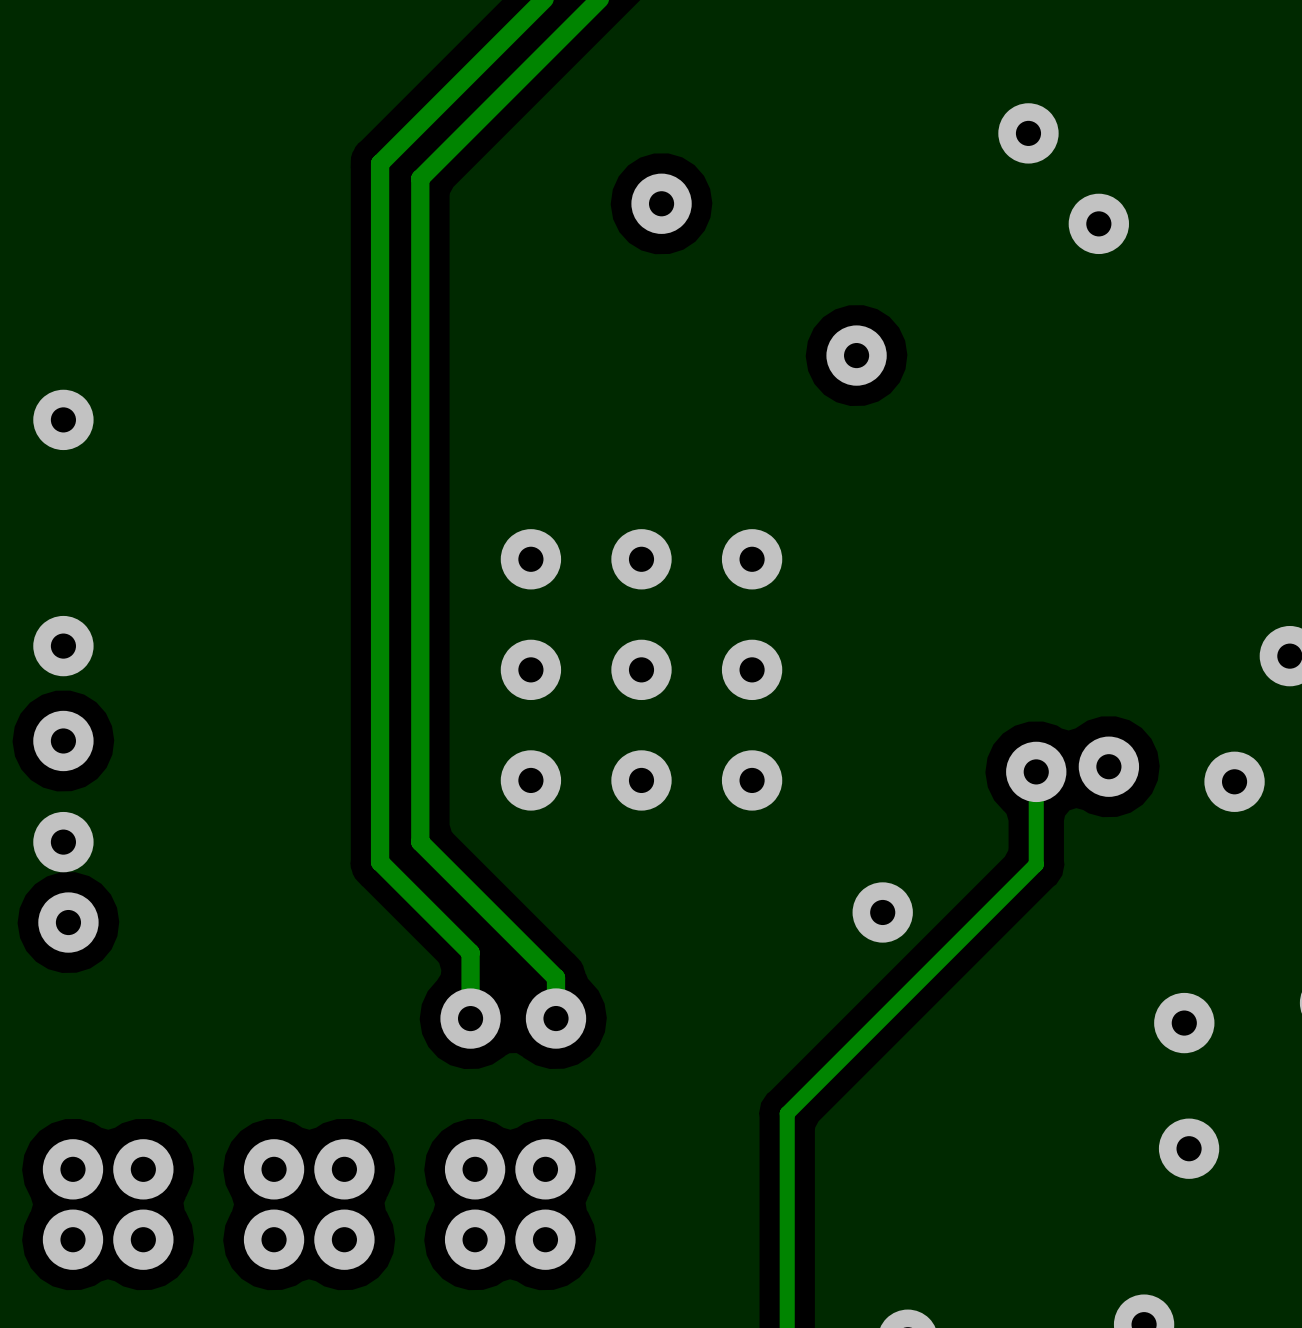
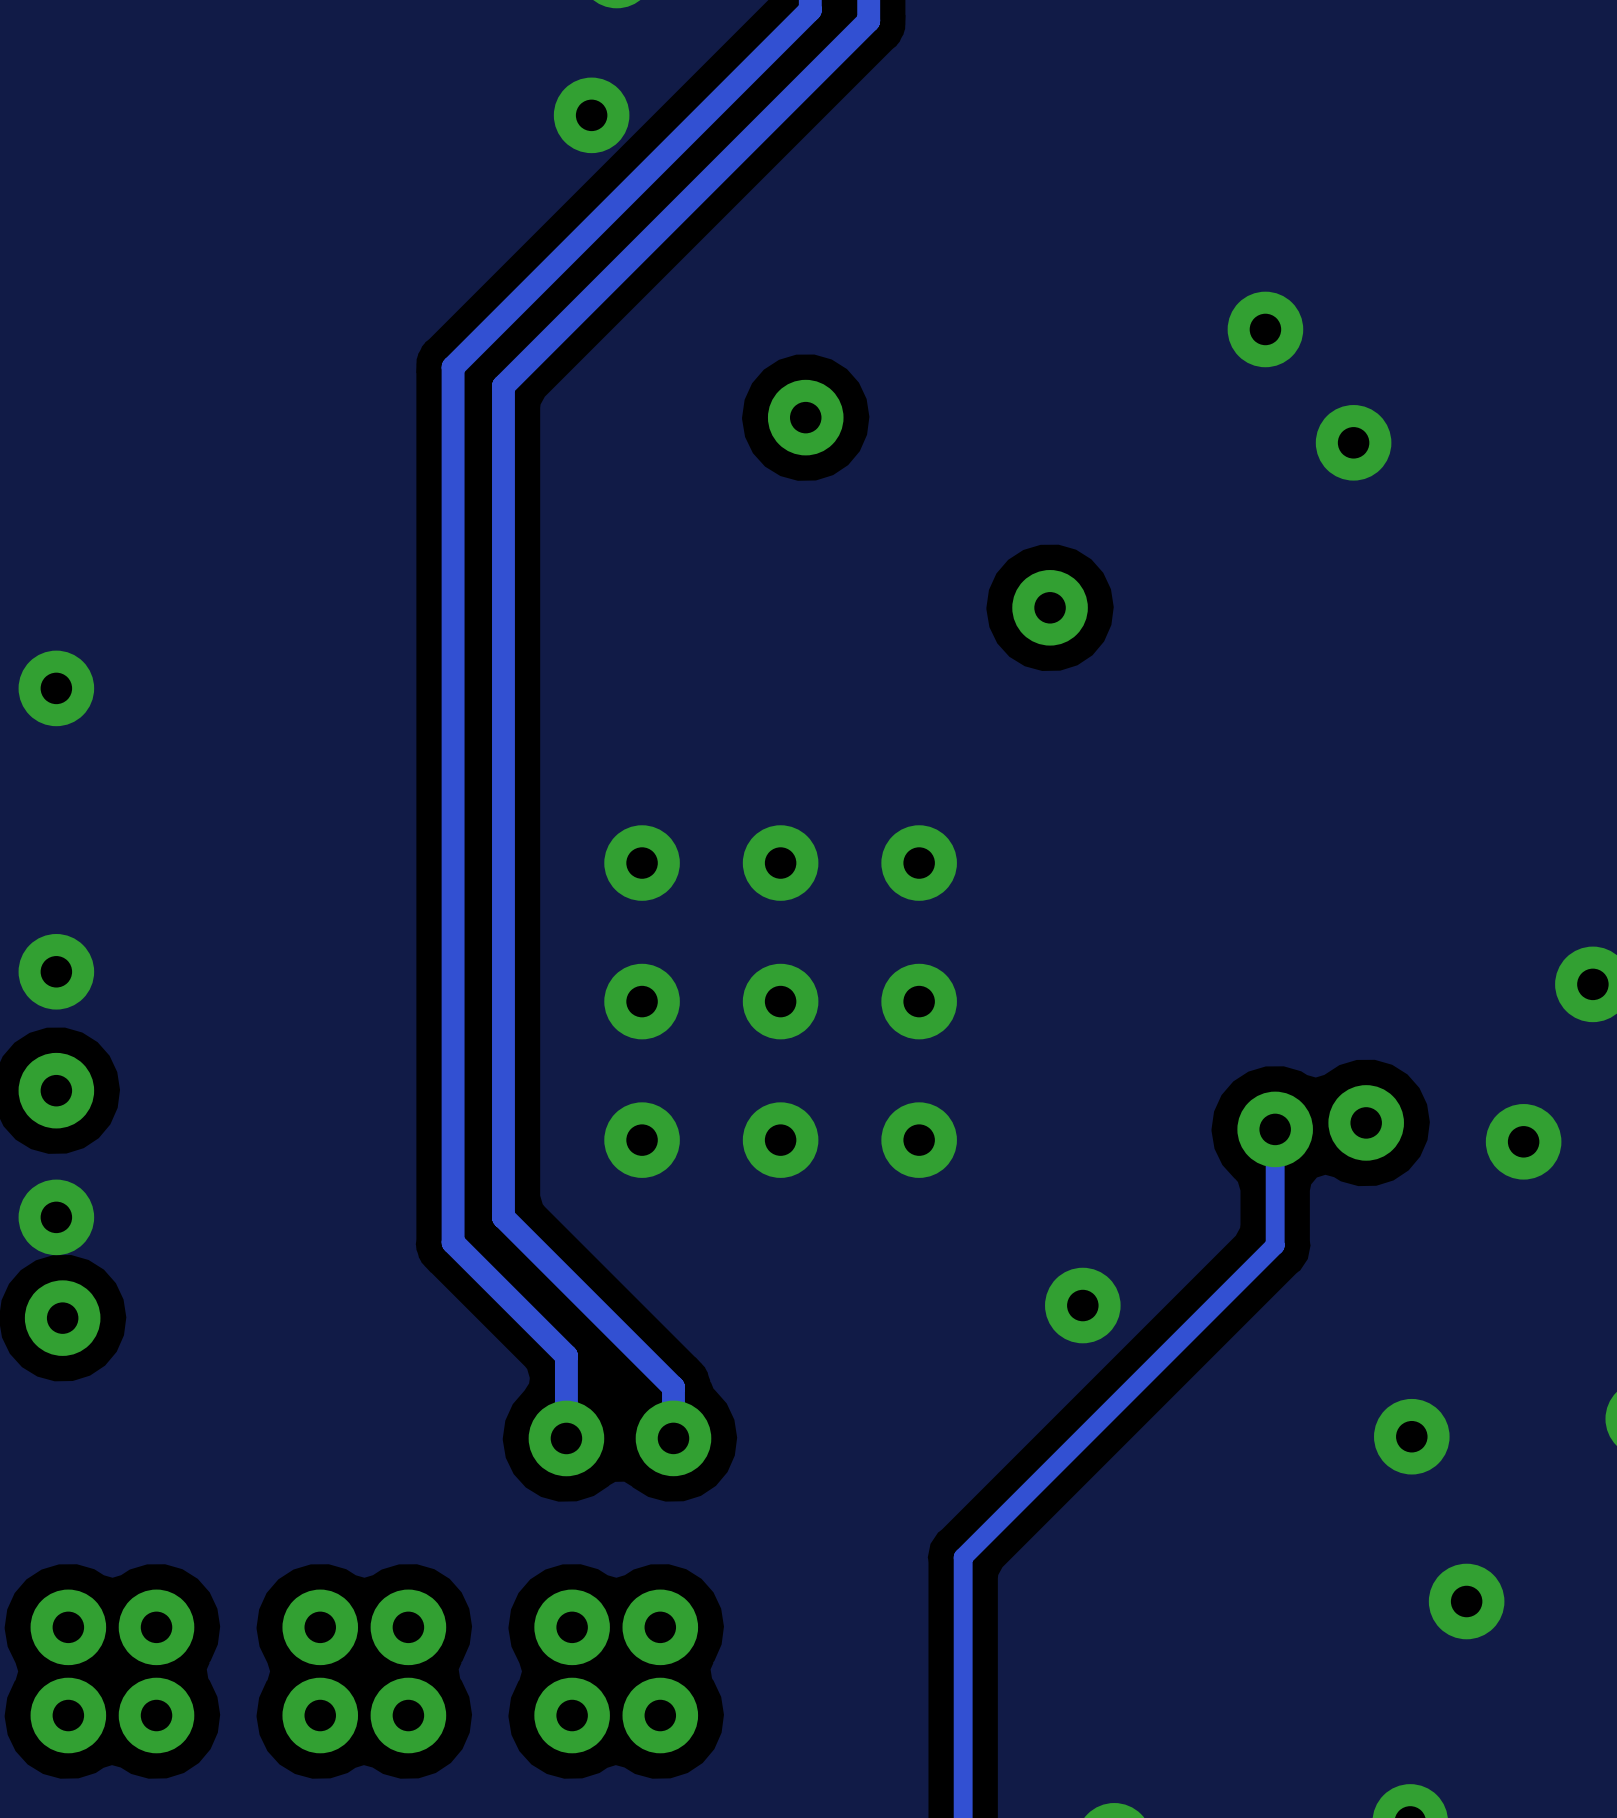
via position: (1184, 1023) -> (1411, 1436)

